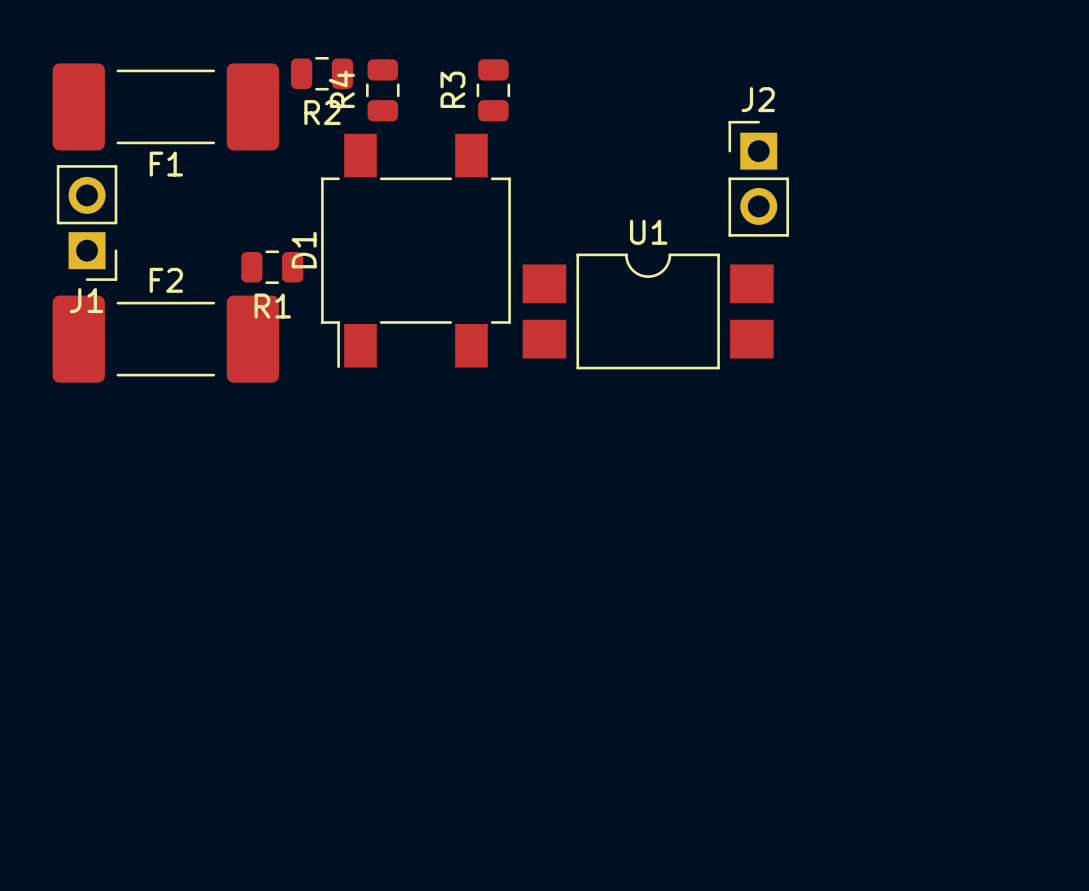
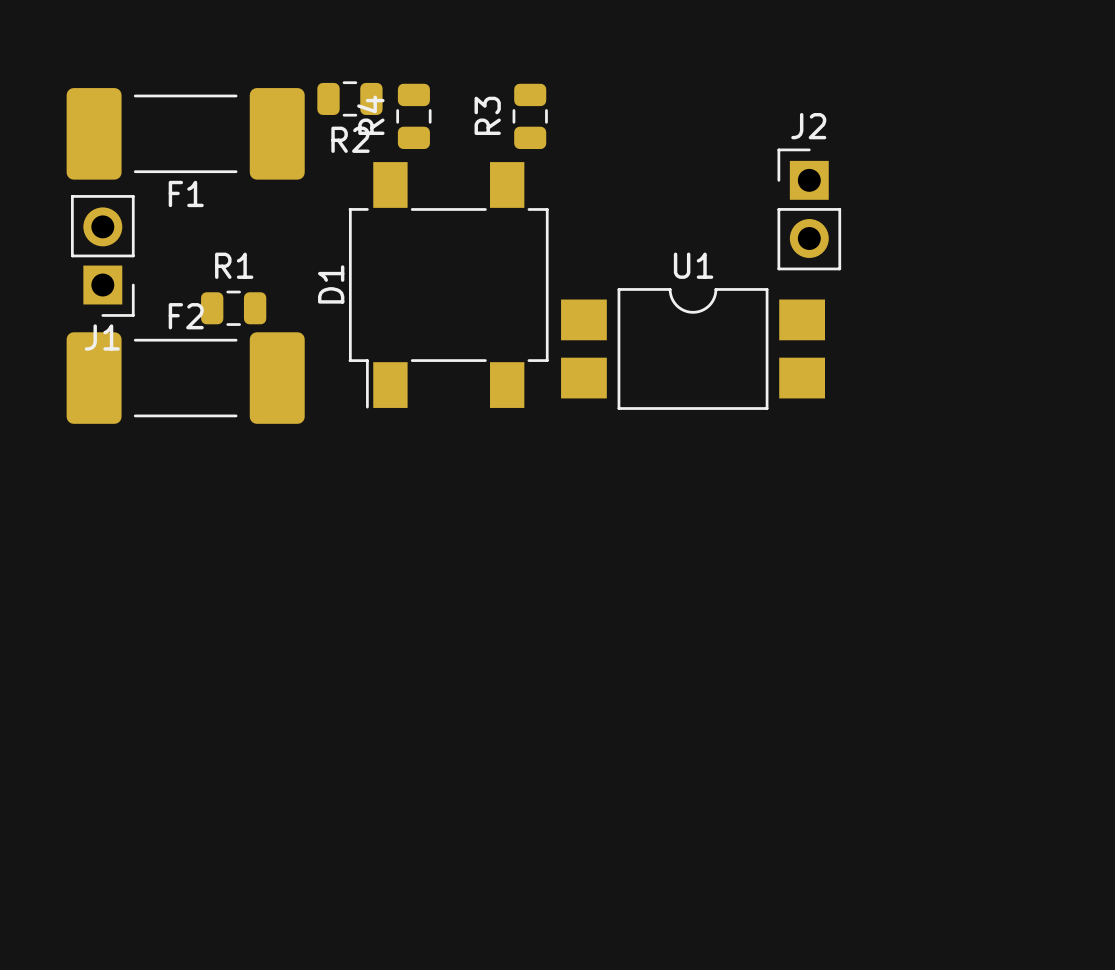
R1 position: (272, 267) -> (233, 308)
R1 name position: R1 (272, 306) -> R1 (234, 265)

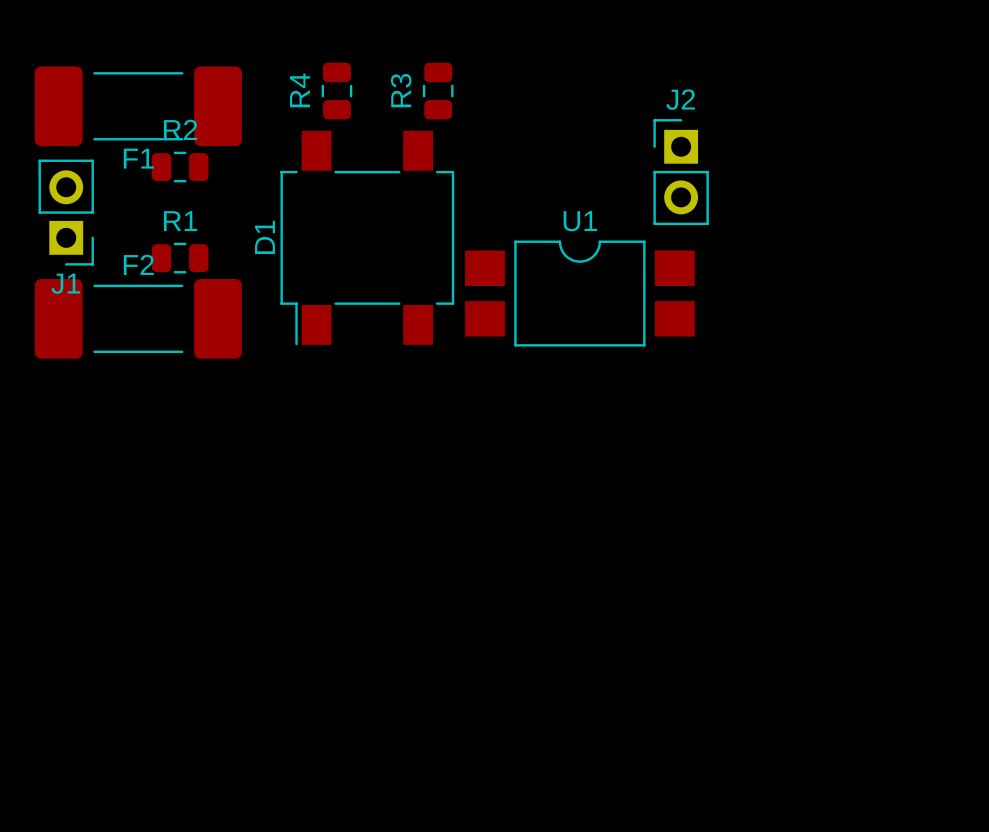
R2 position: (349, 98) -> (180, 167)
R2 name position: R2 (350, 139) -> R2 (180, 129)

